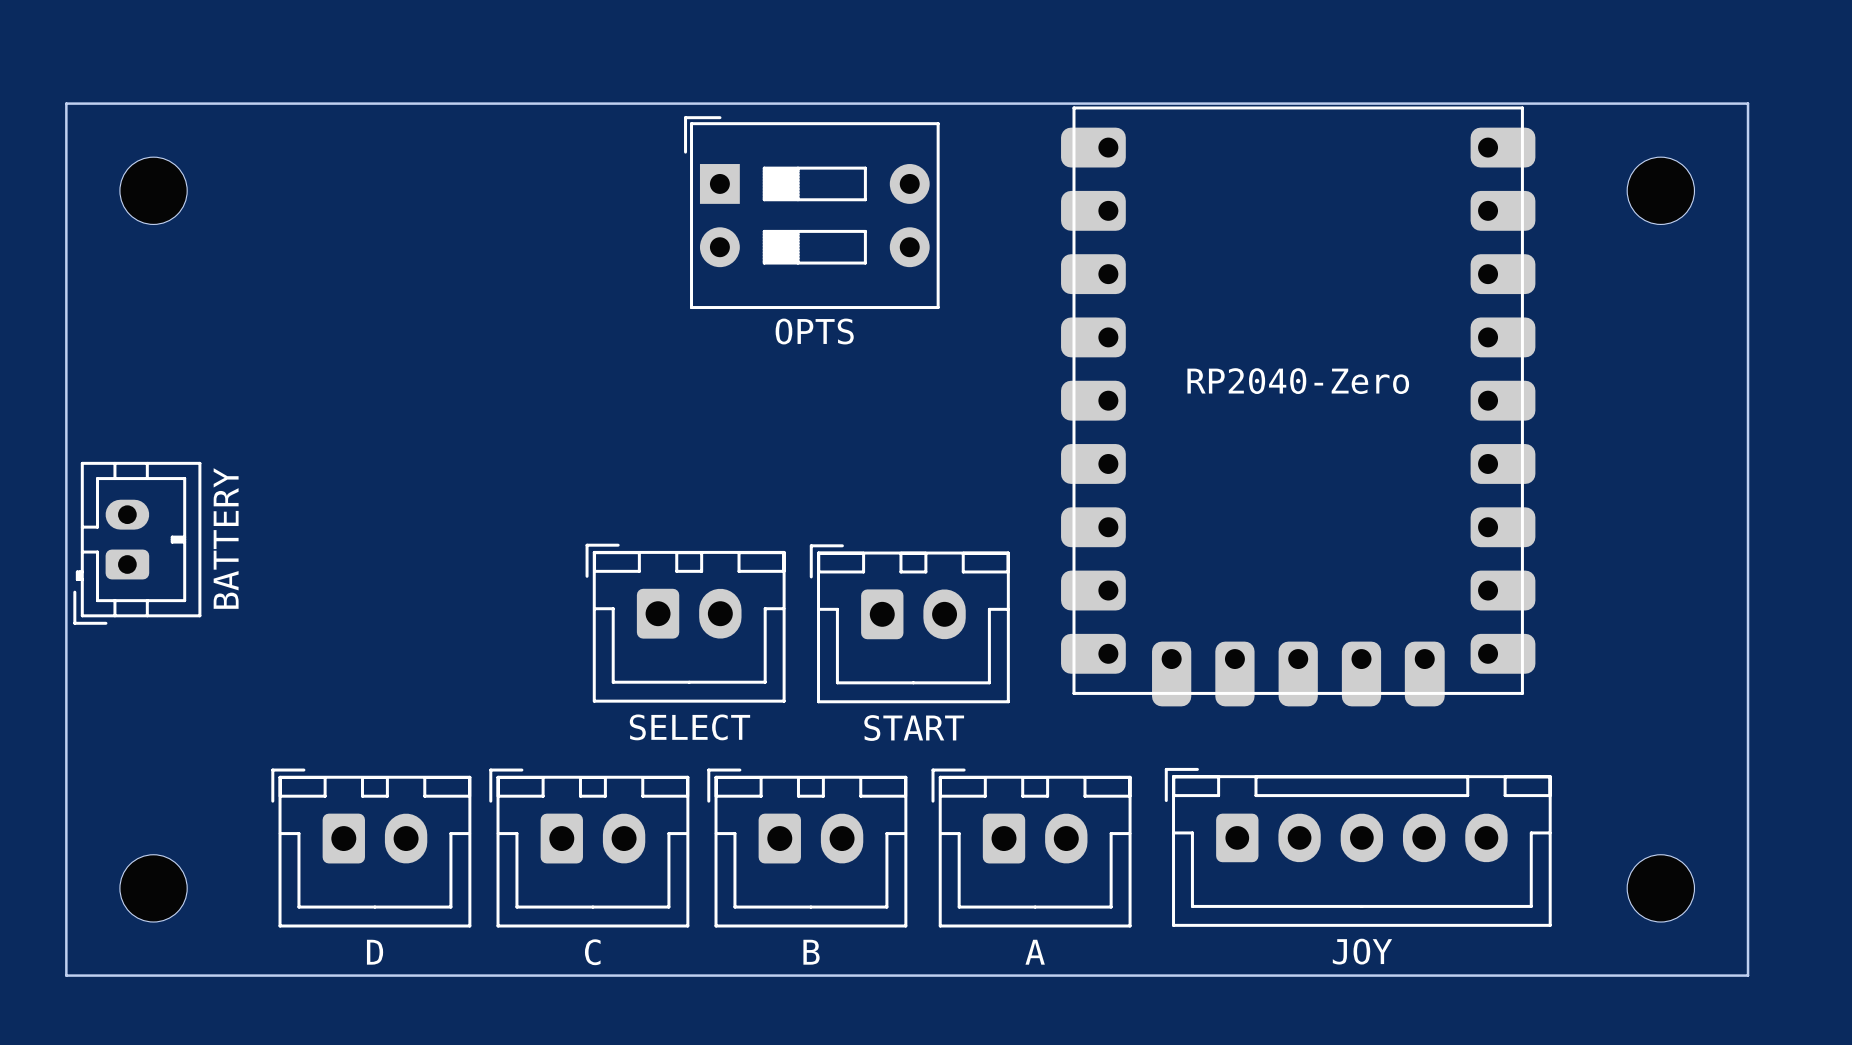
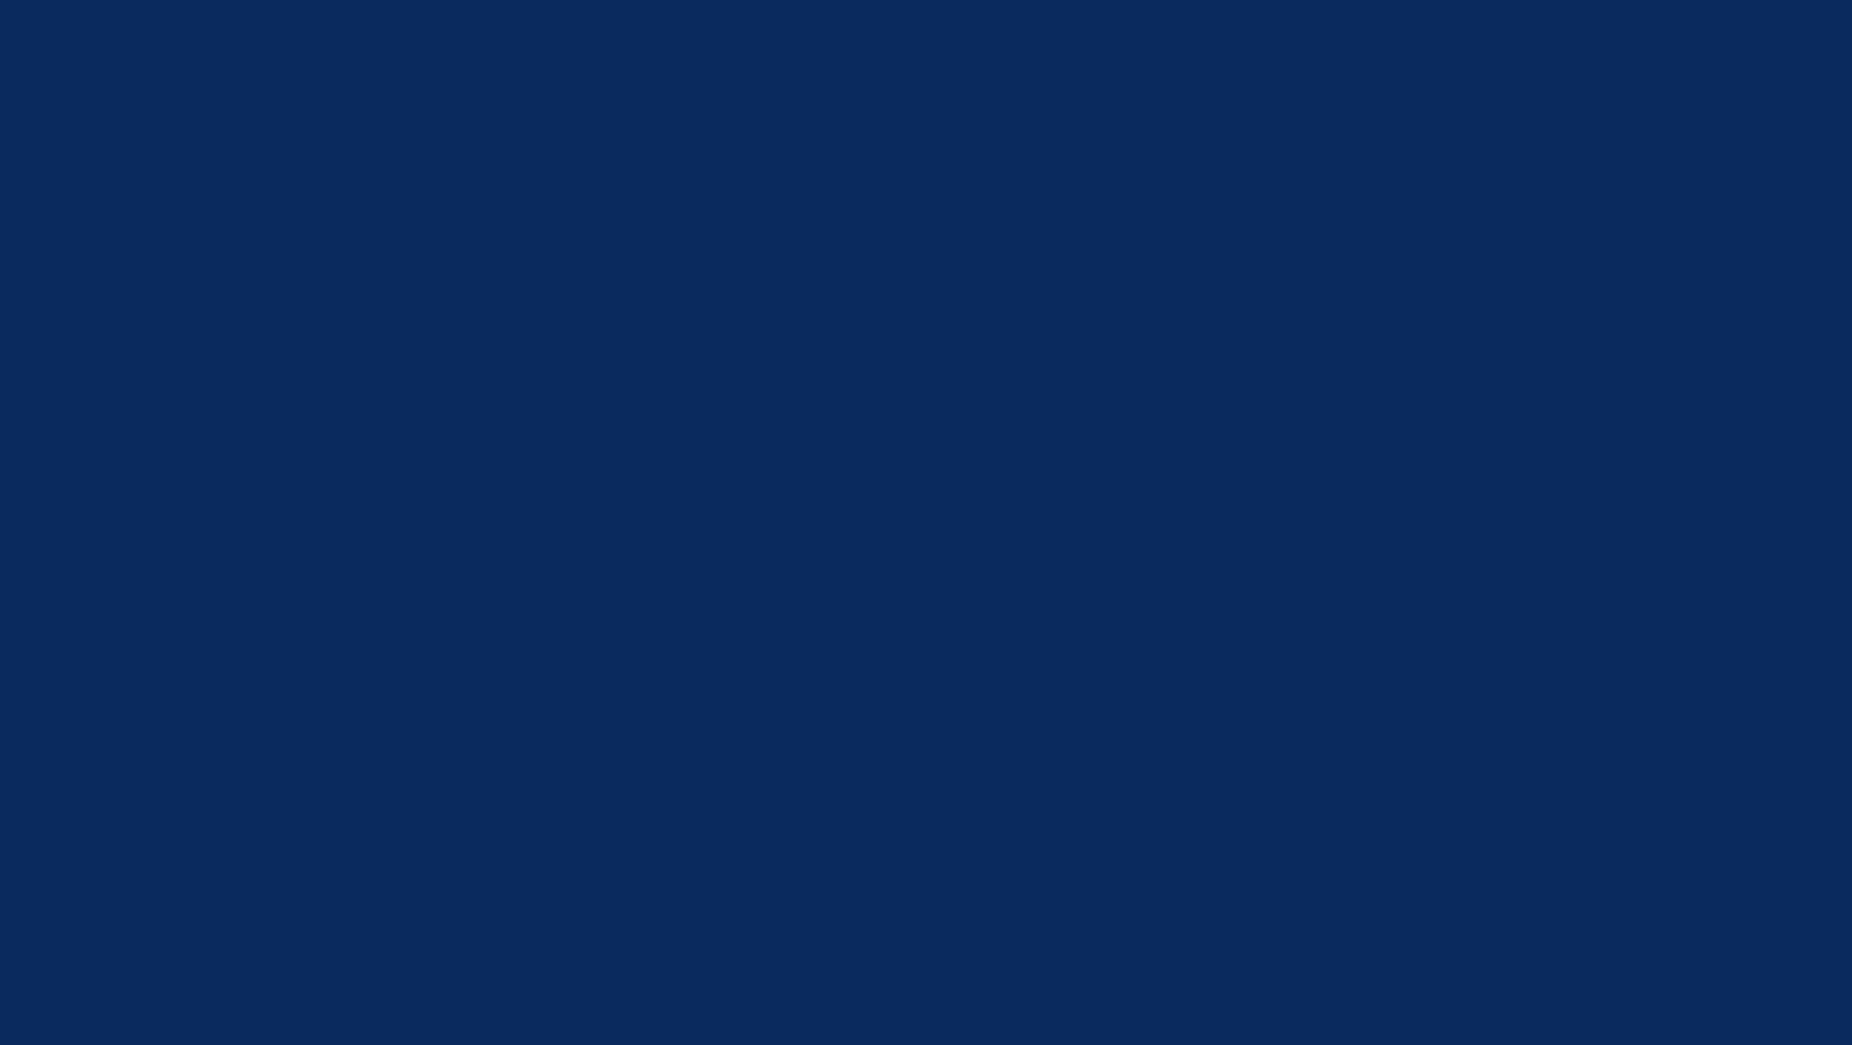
board edge: (66, 103) (1748, 103) (1748, 975) (66, 975) (66, 103) -> none
part: (153, 190) -> none
part: (1660, 190) -> none
part: OPTS (811, 212) -> none
part: RP2040-Zero (1298, 406) -> none
part: BATTERY (137, 543) -> none
part: SELECT (685, 623) -> none
part: START (909, 623) -> none
part: JOY (1358, 847) -> none
part: D (371, 848) -> none
part: C (589, 848) -> none
part: B (807, 848) -> none
part: A (1031, 848) -> none
part: (153, 888) -> none
part: (1660, 888) -> none

